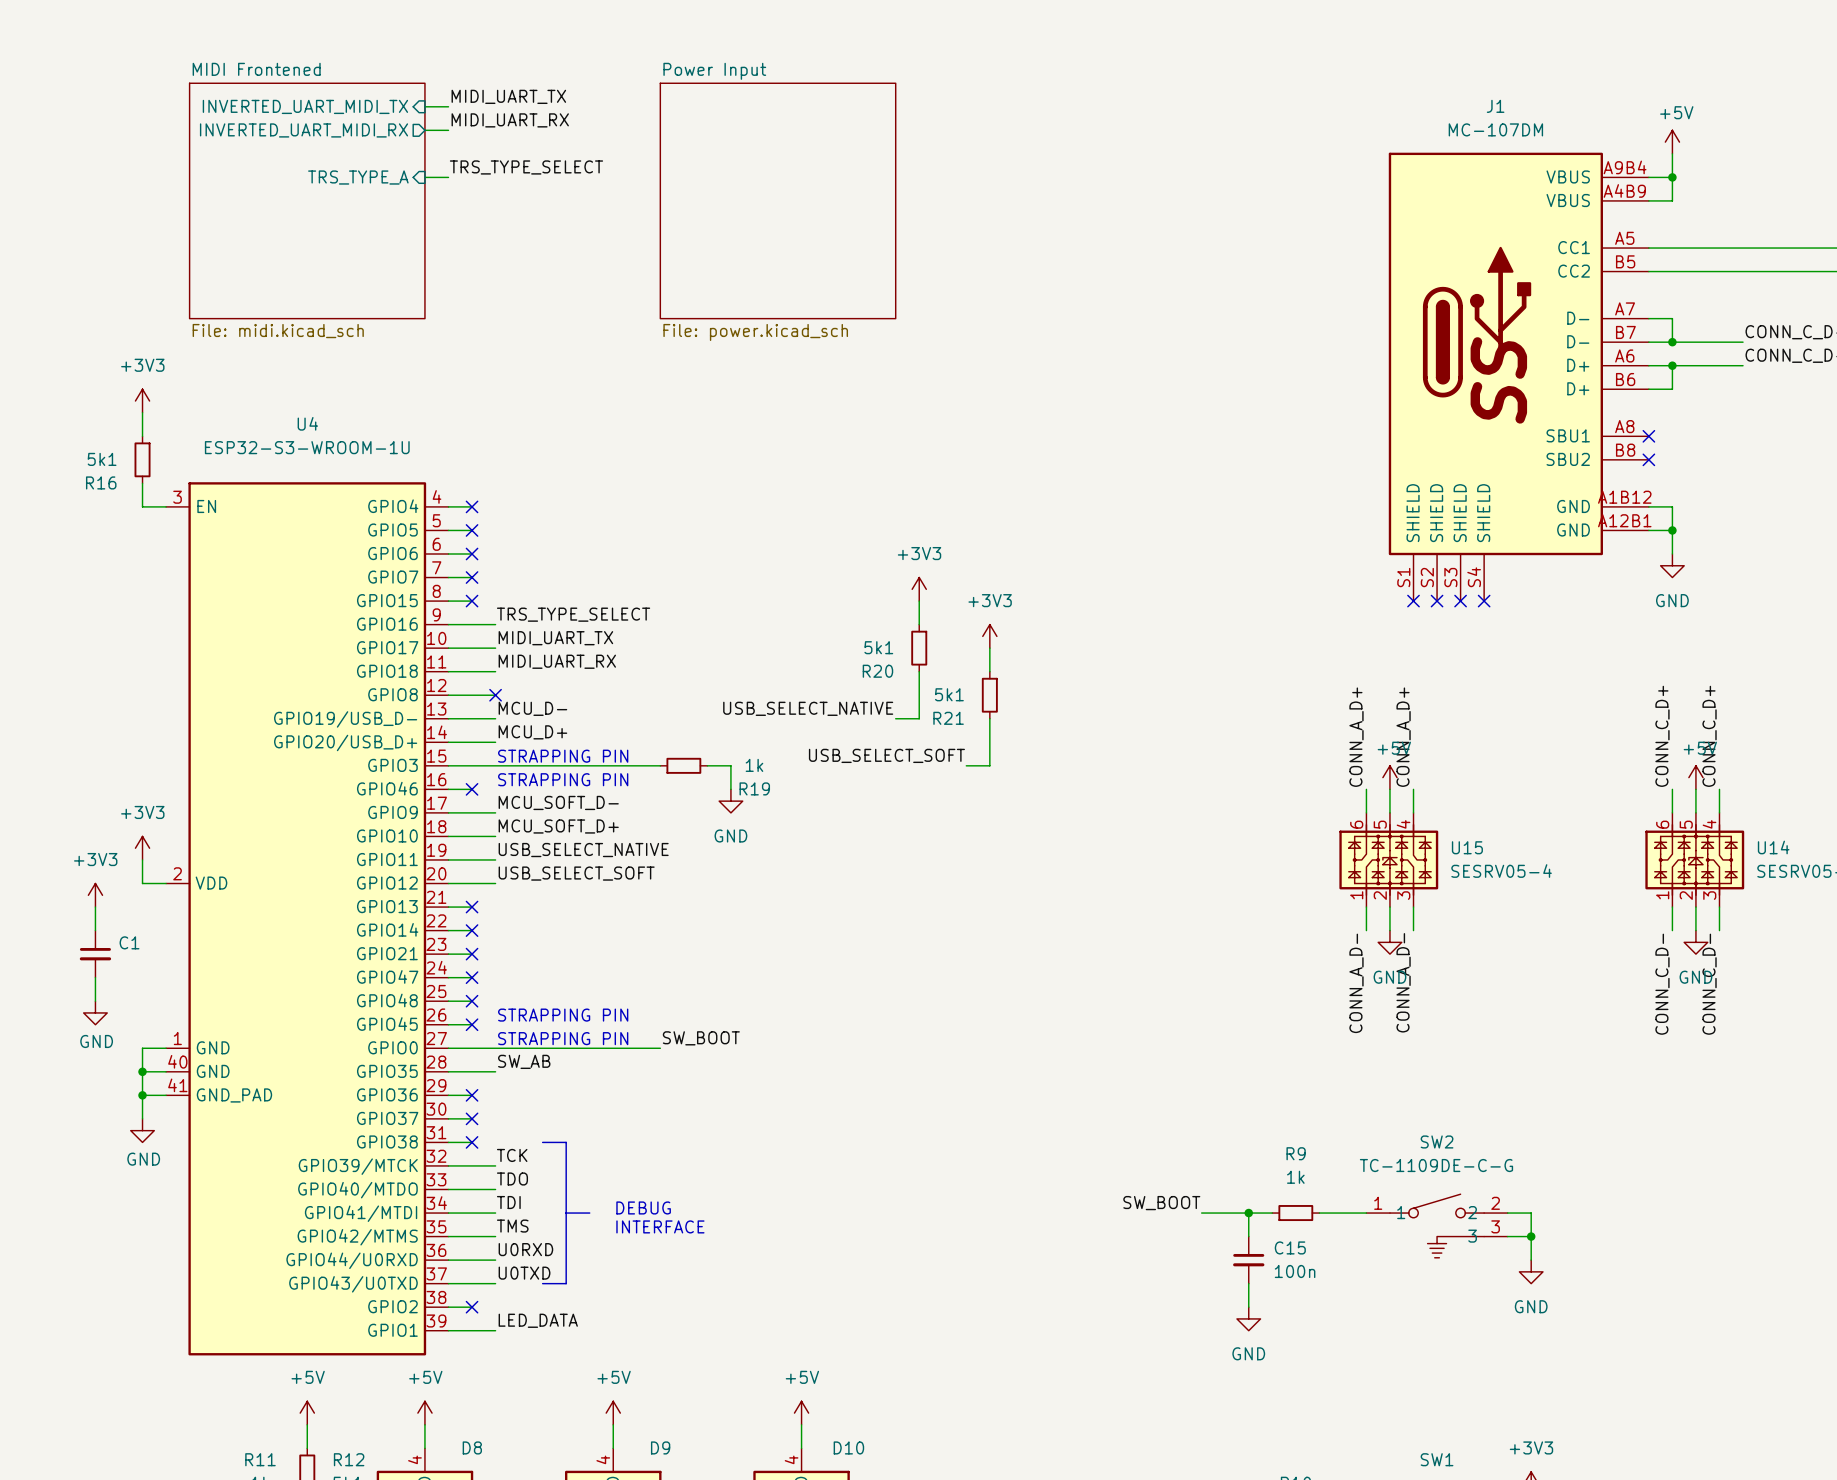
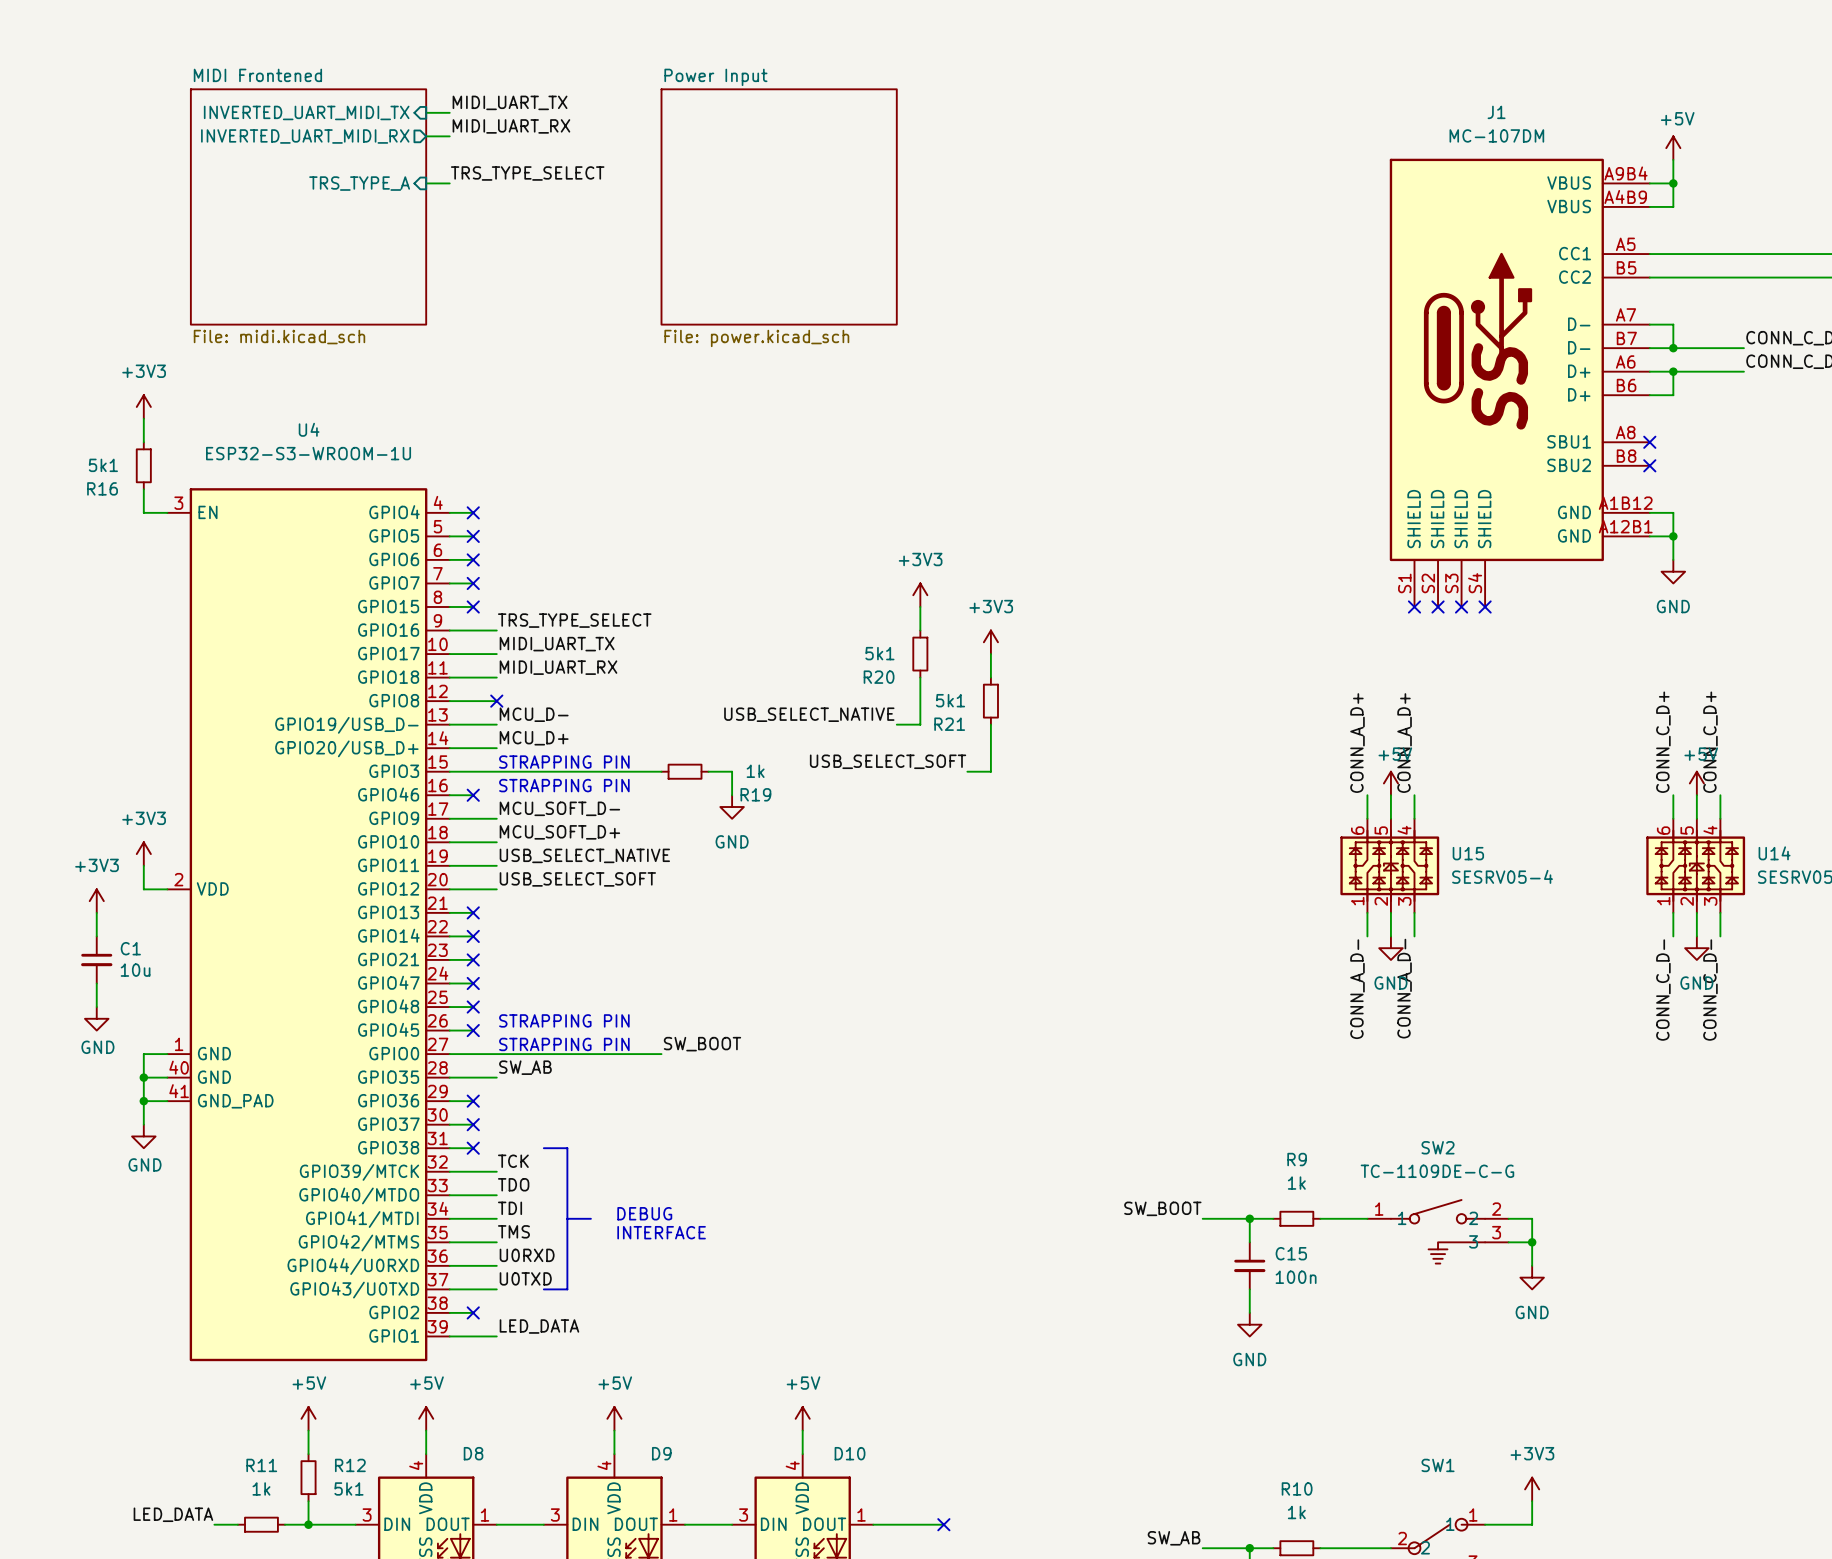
C1 value: none -> 10u (135, 970)

